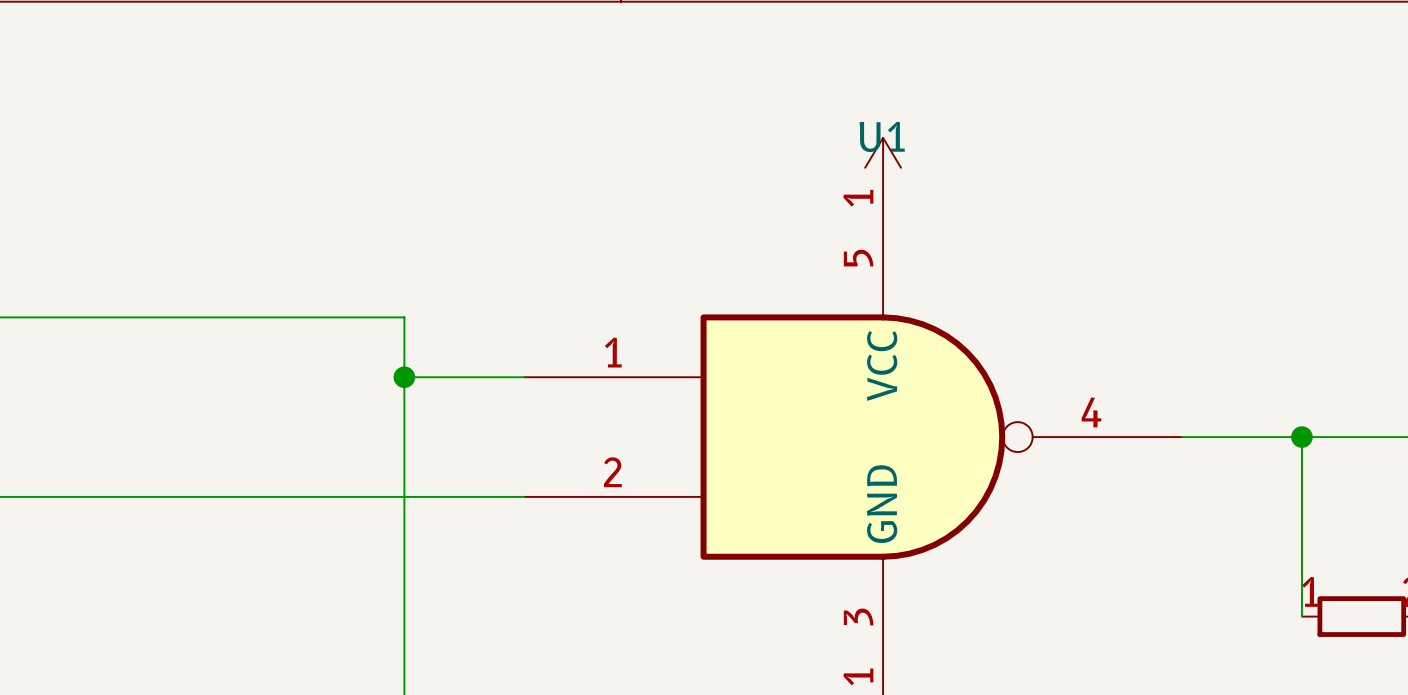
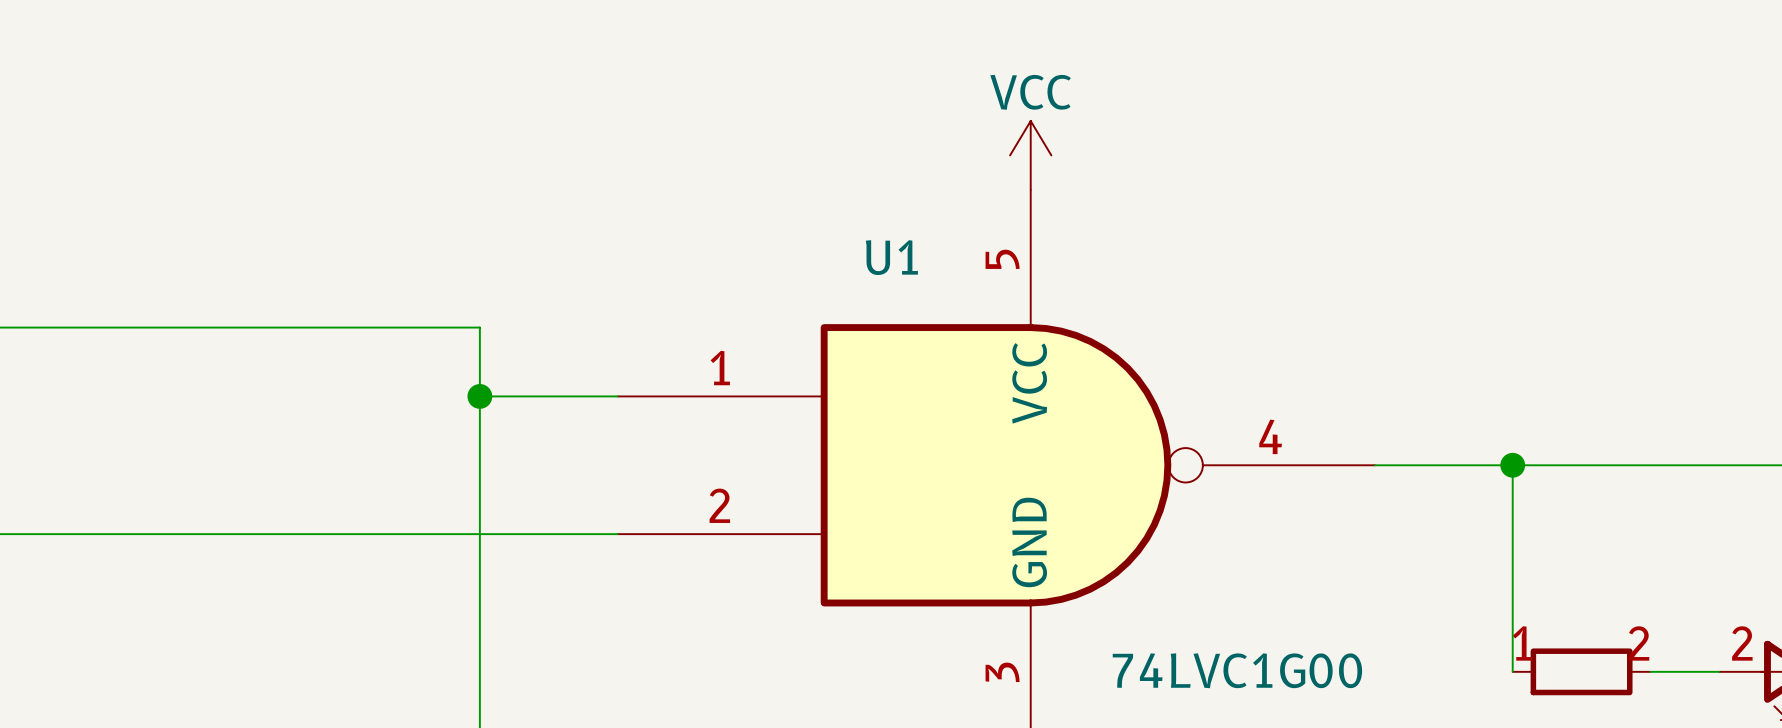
power symbol text: none -> VCC (1030, 92)
U1 name position: U1 (882, 136) -> U1 (891, 257)
power symbol pin number: 1 (858, 198) -> none
U1 value: none -> 74LVC1G00 (1237, 670)

